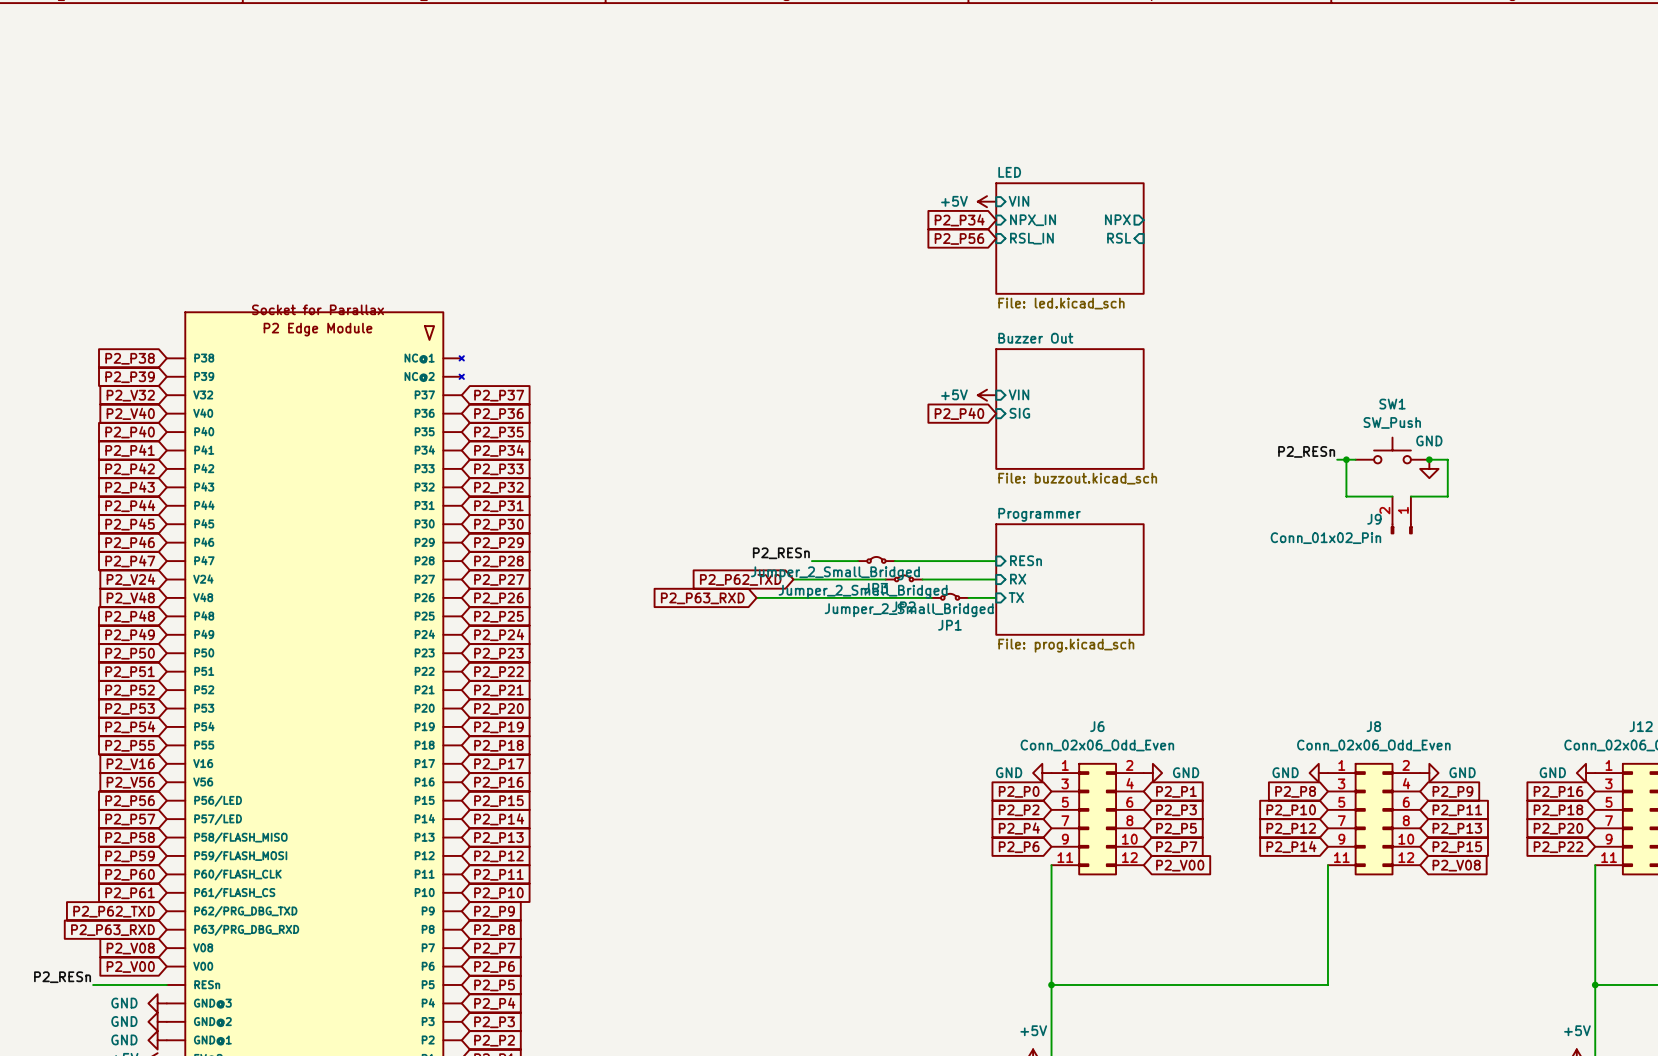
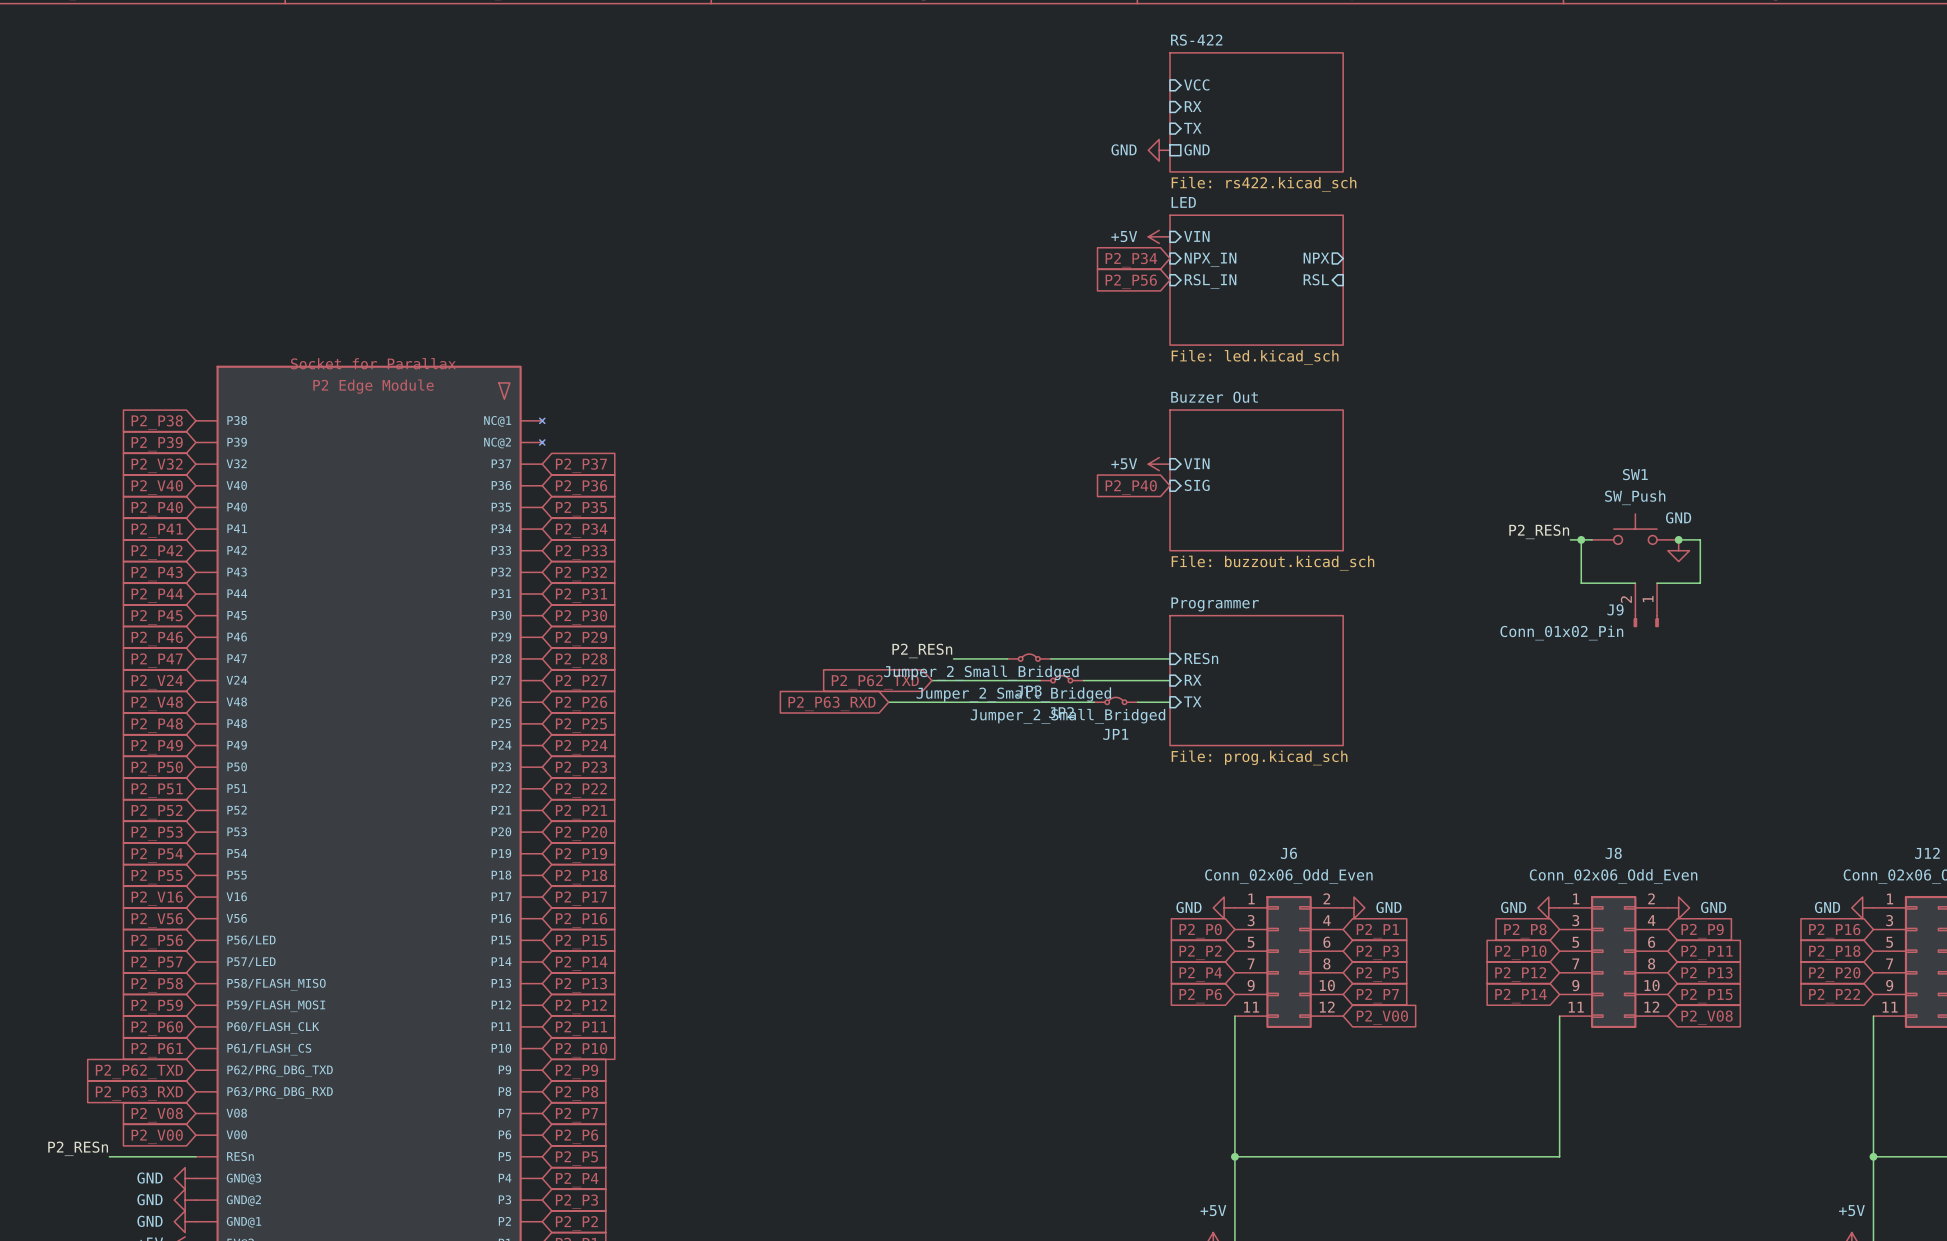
sheet pin: none -> VCC (1196, 84)
sheet pin: none -> RX (1193, 106)
sheet RS-422: none -> File: rs422.kicad_sch (1256, 112)
sheet pin: none -> TX (1192, 128)
power symbol: none -> GND (1159, 150)
sheet pin: none -> GND (1197, 149)

